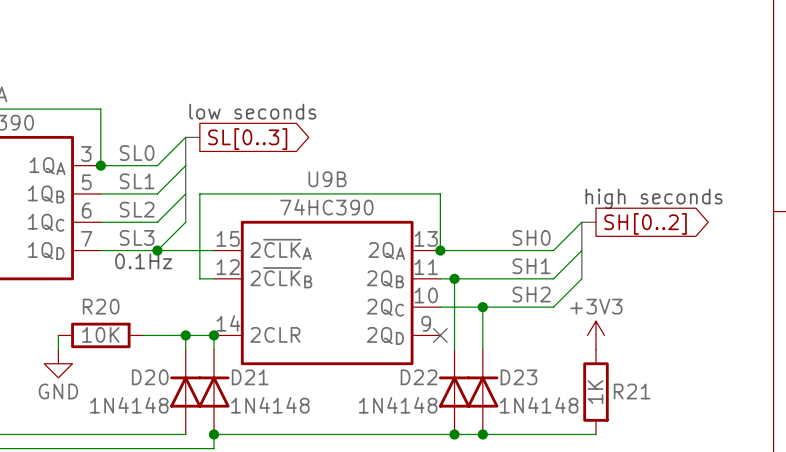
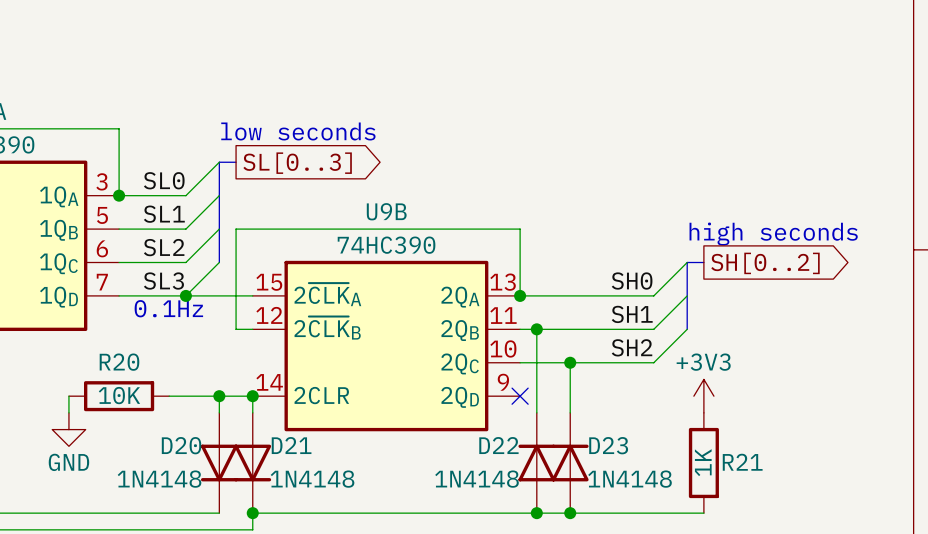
D20 rotation: 0° (185, 392) -> 180° (219, 463)
D21 rotation: 0° (214, 392) -> 180° (252, 463)

